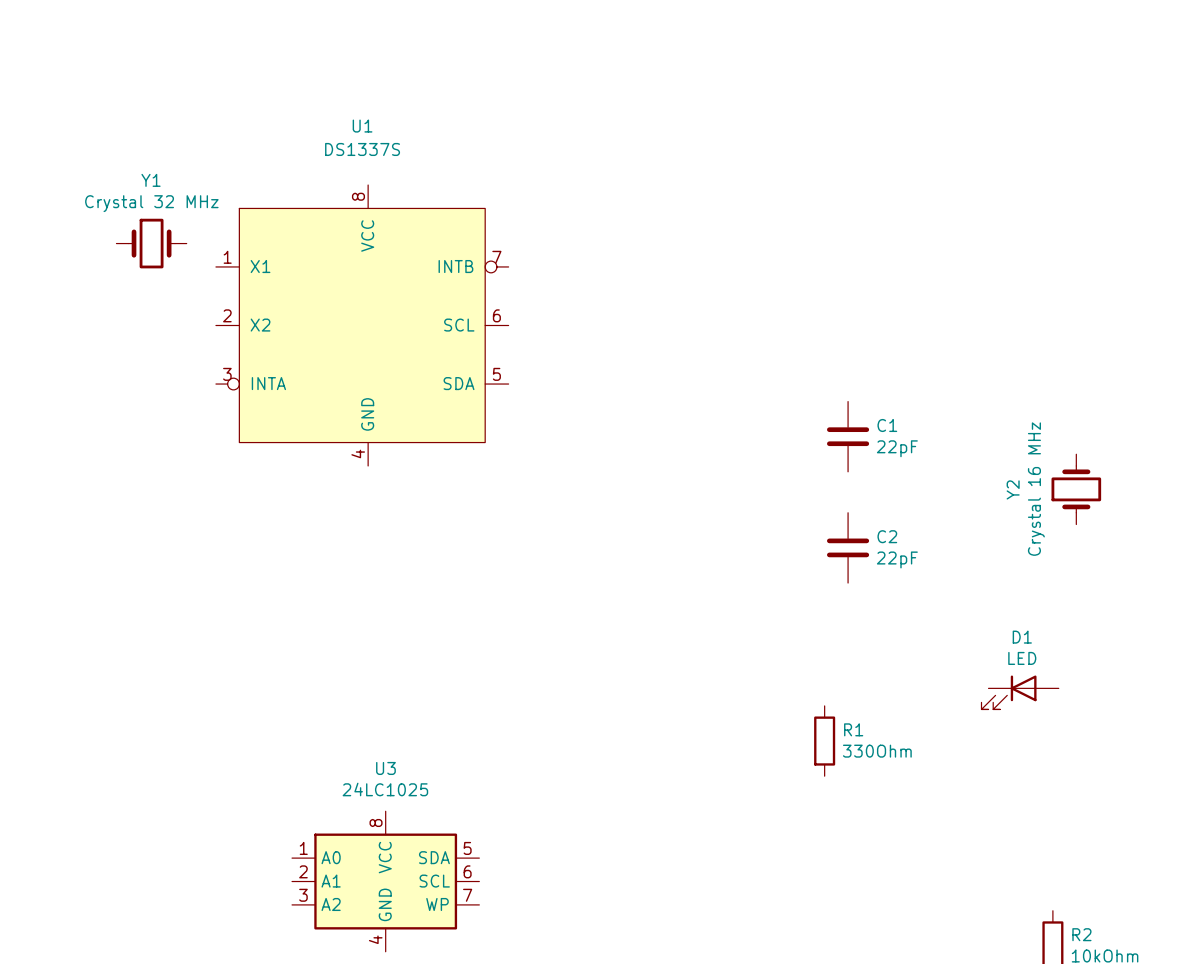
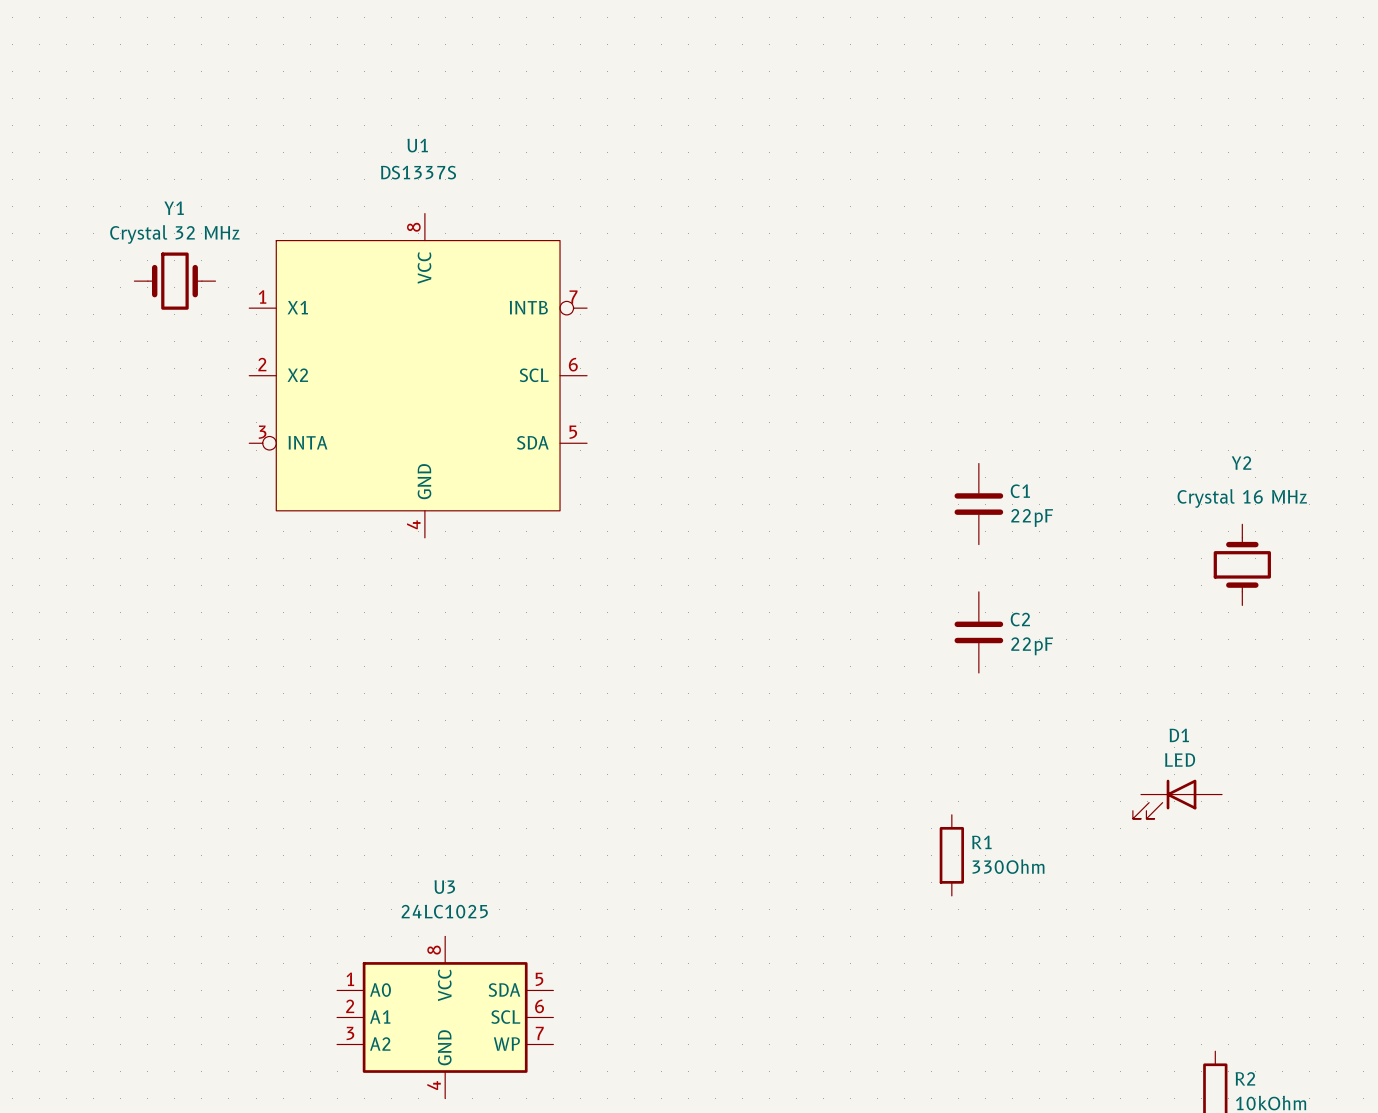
Y2 name rotation: 0° (1013, 489) -> 90° clockwise (1241, 463)
Y2 name position: Y2 (1013, 489) -> Y2 (1241, 463)
Y2 value rotation: 0° (1036, 489) -> 90° clockwise (1242, 498)

